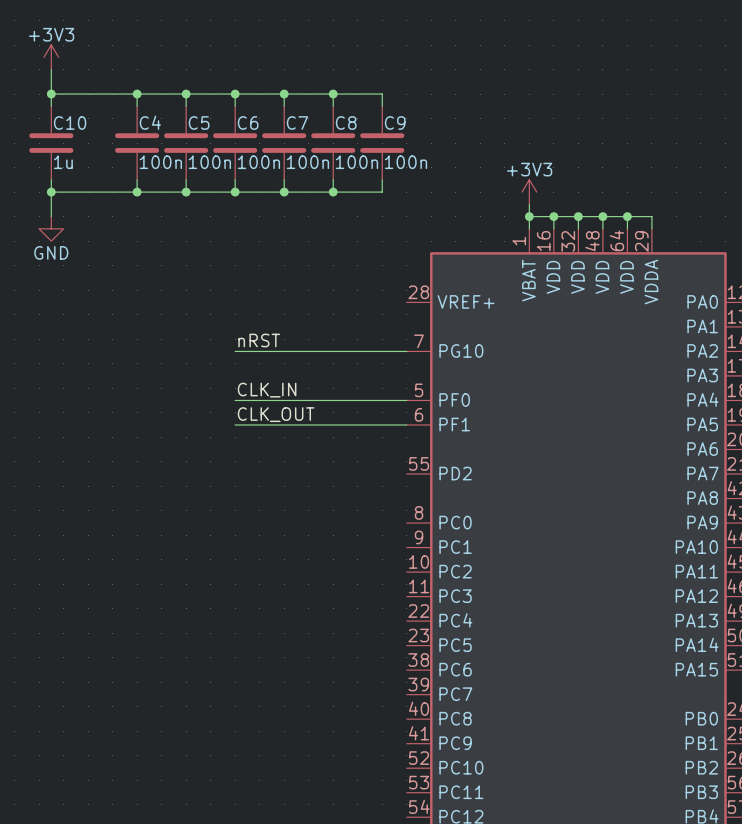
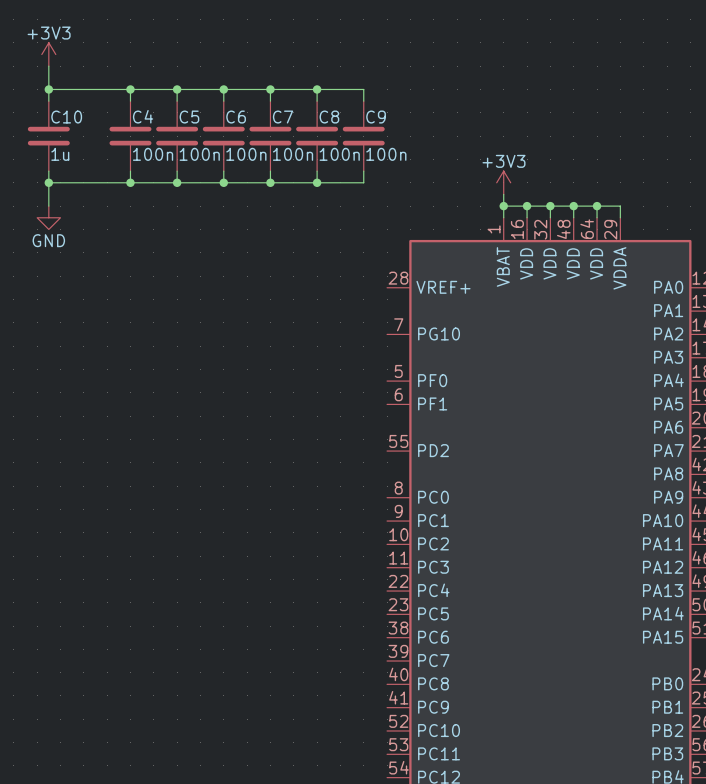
label: nRST (259, 340) -> none
wire: (235, 351) (406, 351) -> none
label: CLK_IN (267, 390) -> none
wire: (235, 400) (406, 400) -> none
label: CLK_OUT (276, 414) -> none
wire: (235, 424) (406, 424) -> none

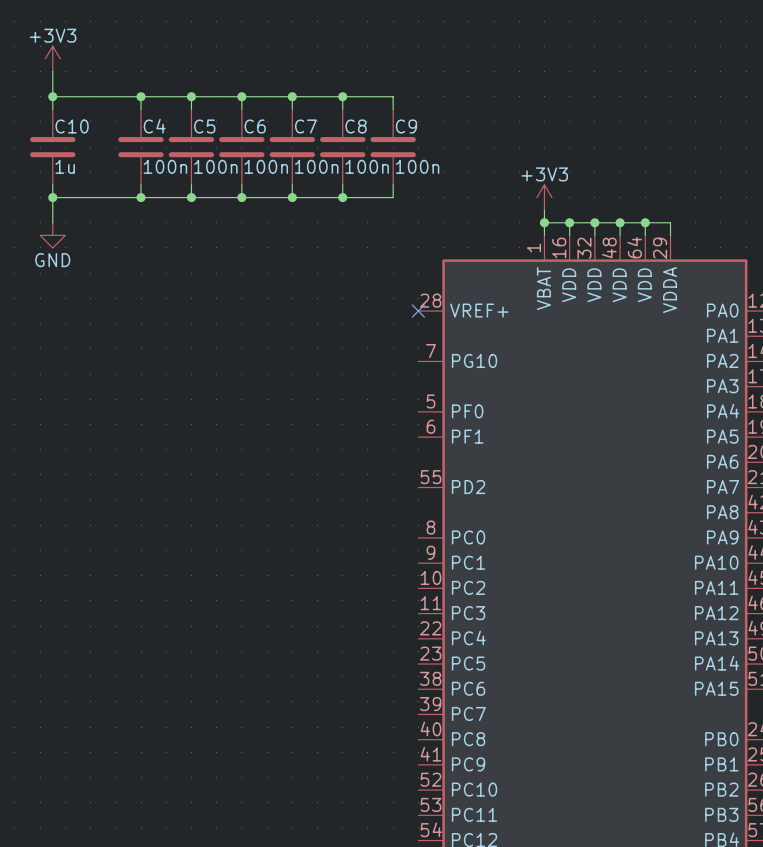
no-connect mark: none -> (418, 311)

